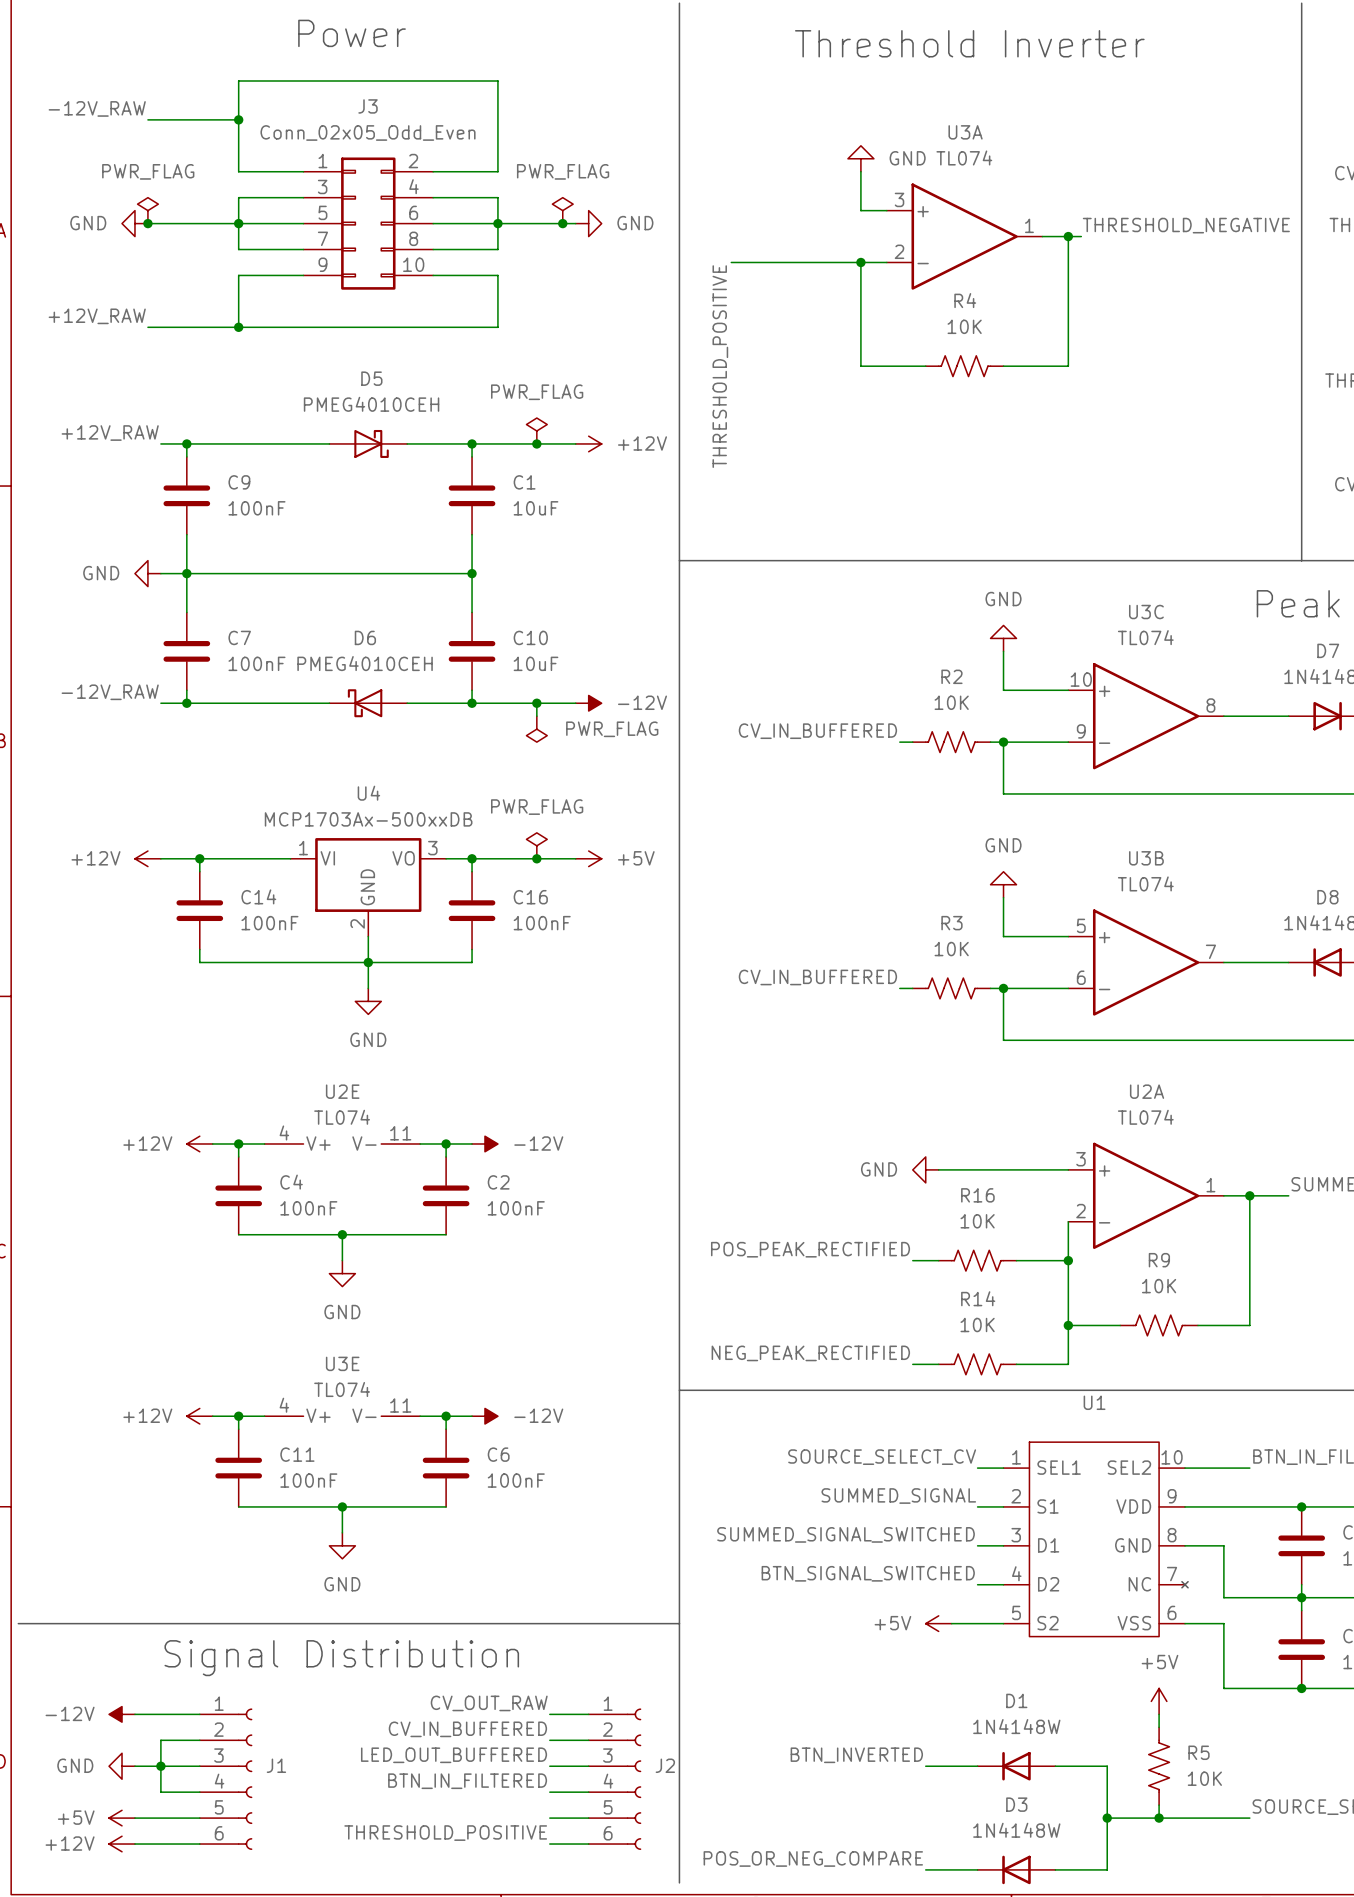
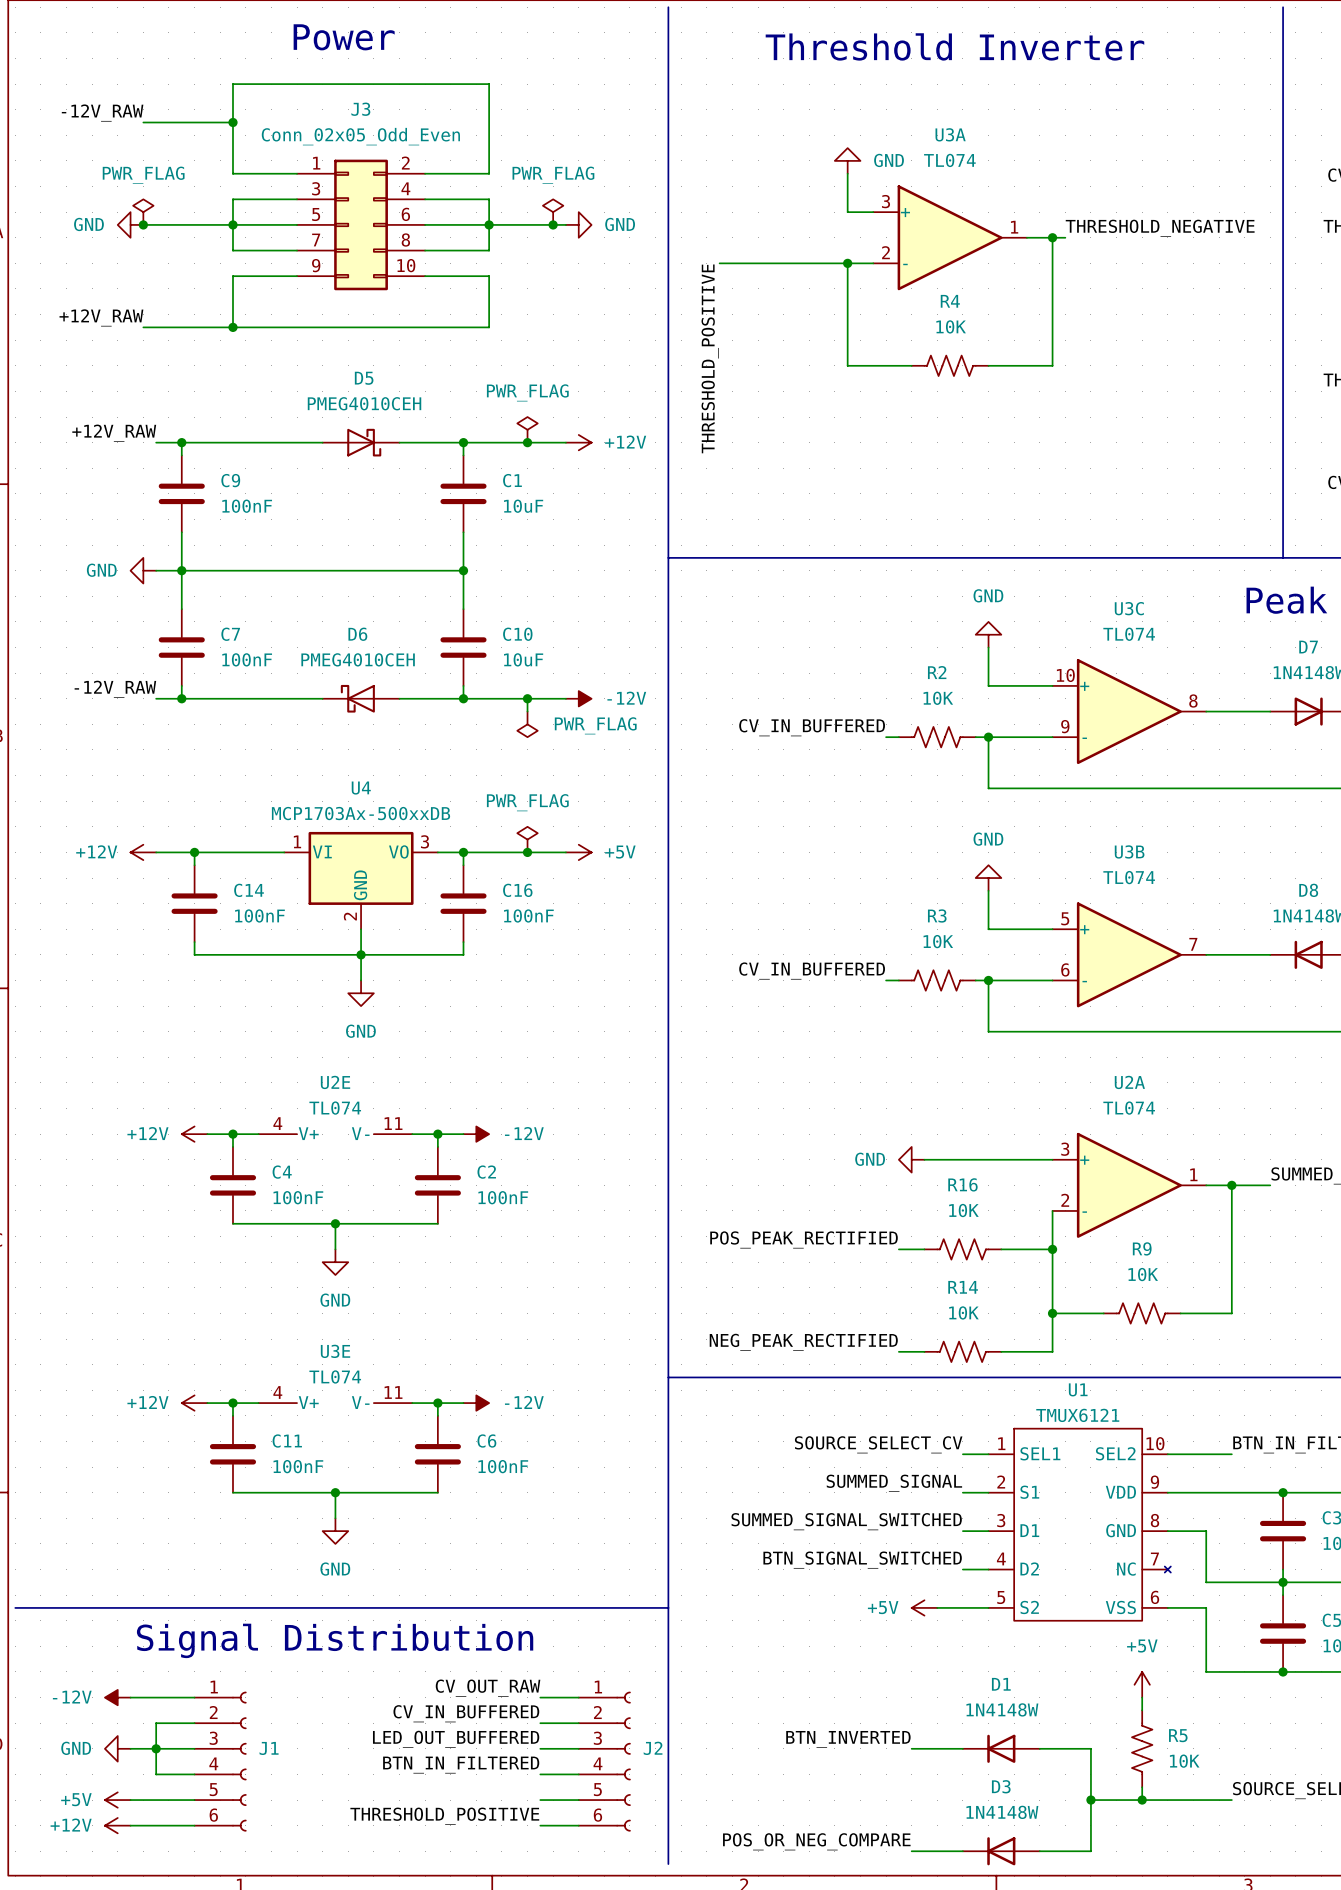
U1 value: none -> TMUX6121 (1077, 1415)

